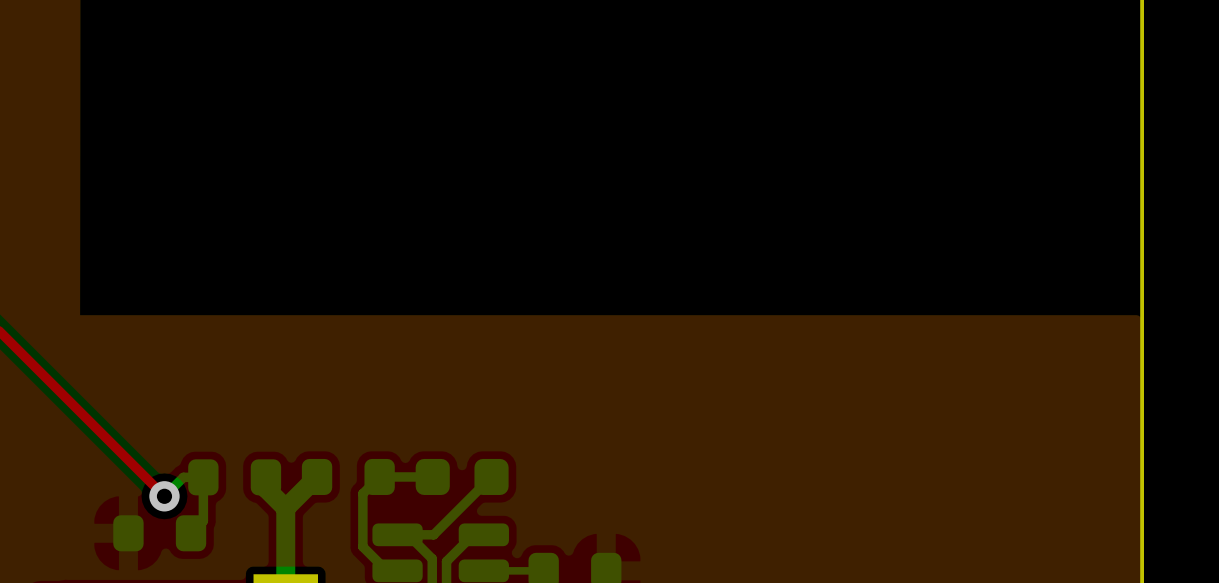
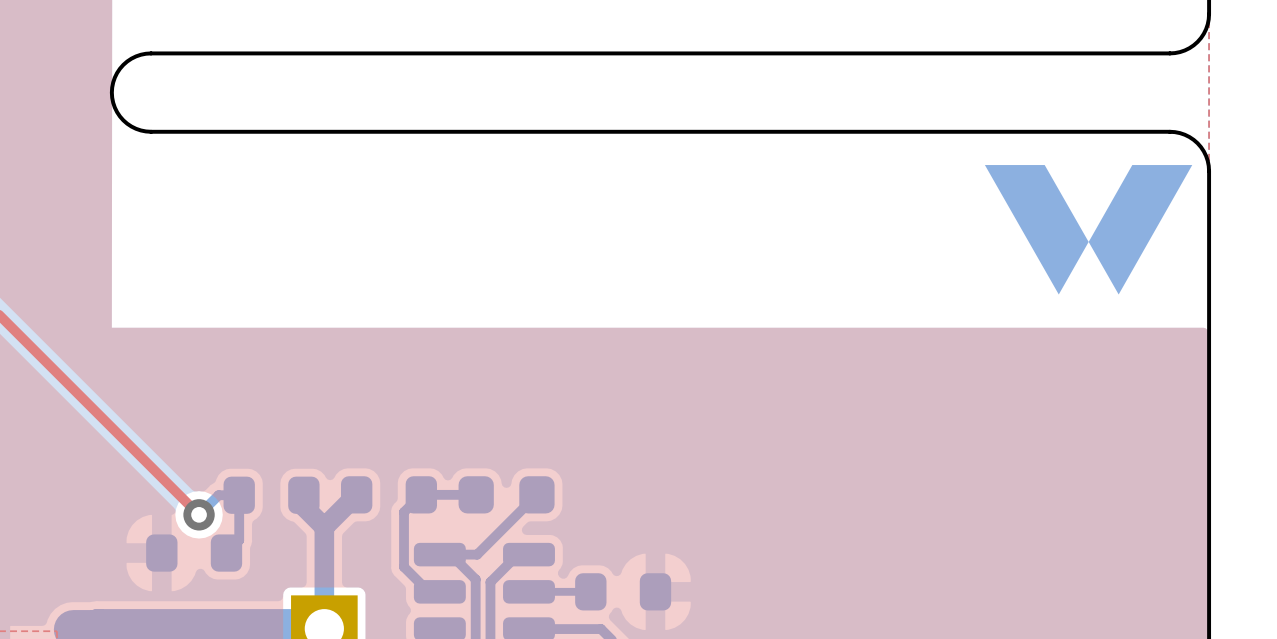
board edge: (1142, 11) (1142, 163) -> (1209, 14) (1206, 29) (1197, 41) (1184, 50) (1169, 53) (145, 53) (131, 58) (123, 64) (114, 77) (111, 92) (114, 107) (123, 120) (131, 126) (145, 131) (1169, 131) (1184, 134) (1197, 143) (1206, 155) (1209, 170)
drawing: none -> [984, 165, 1193, 295]

